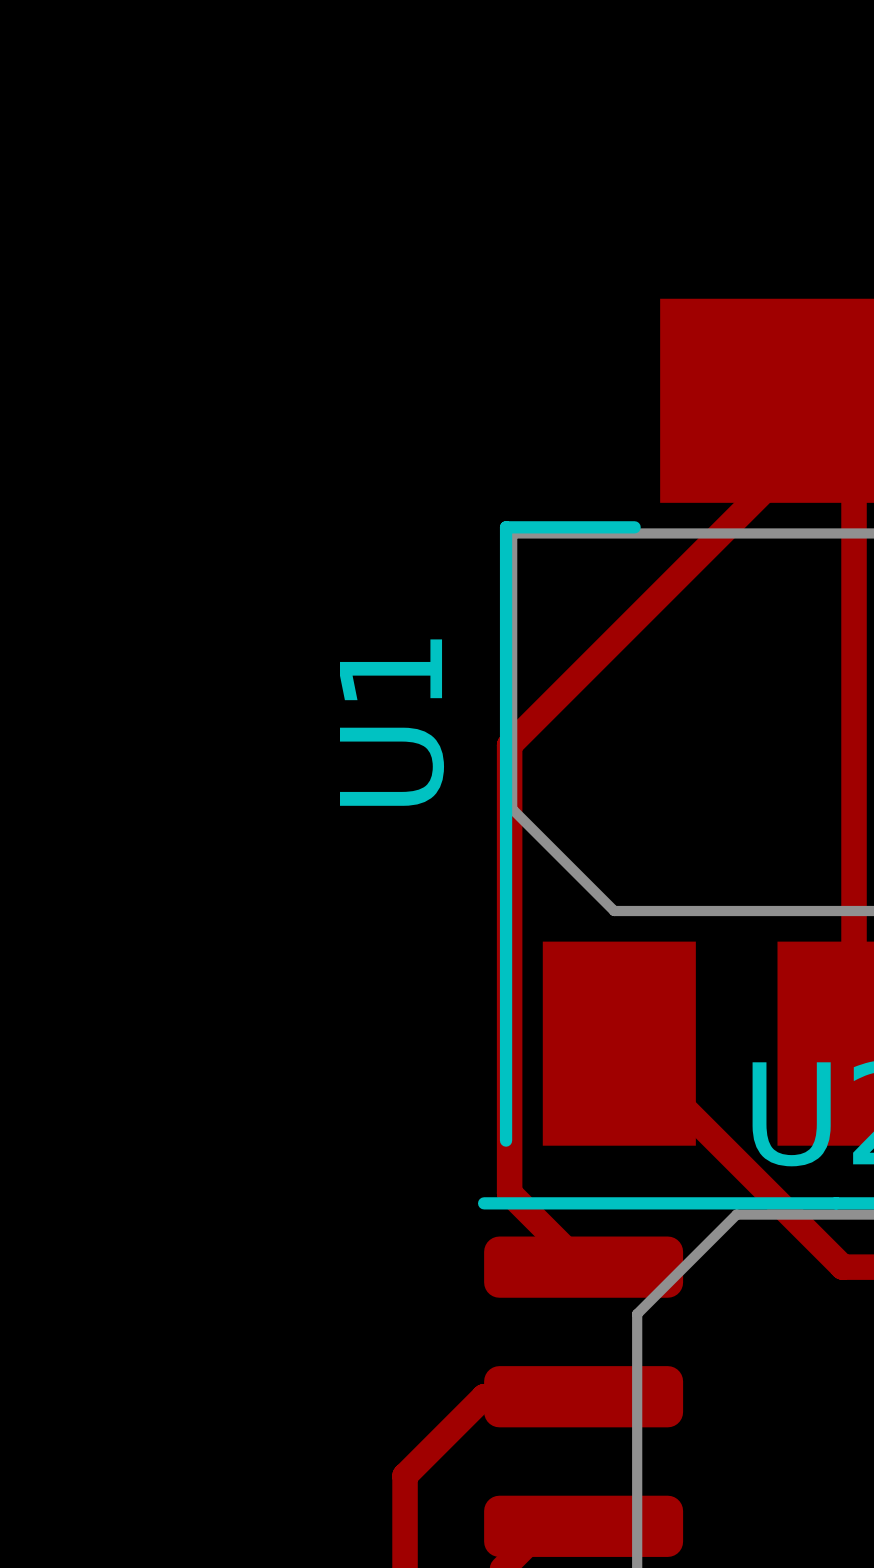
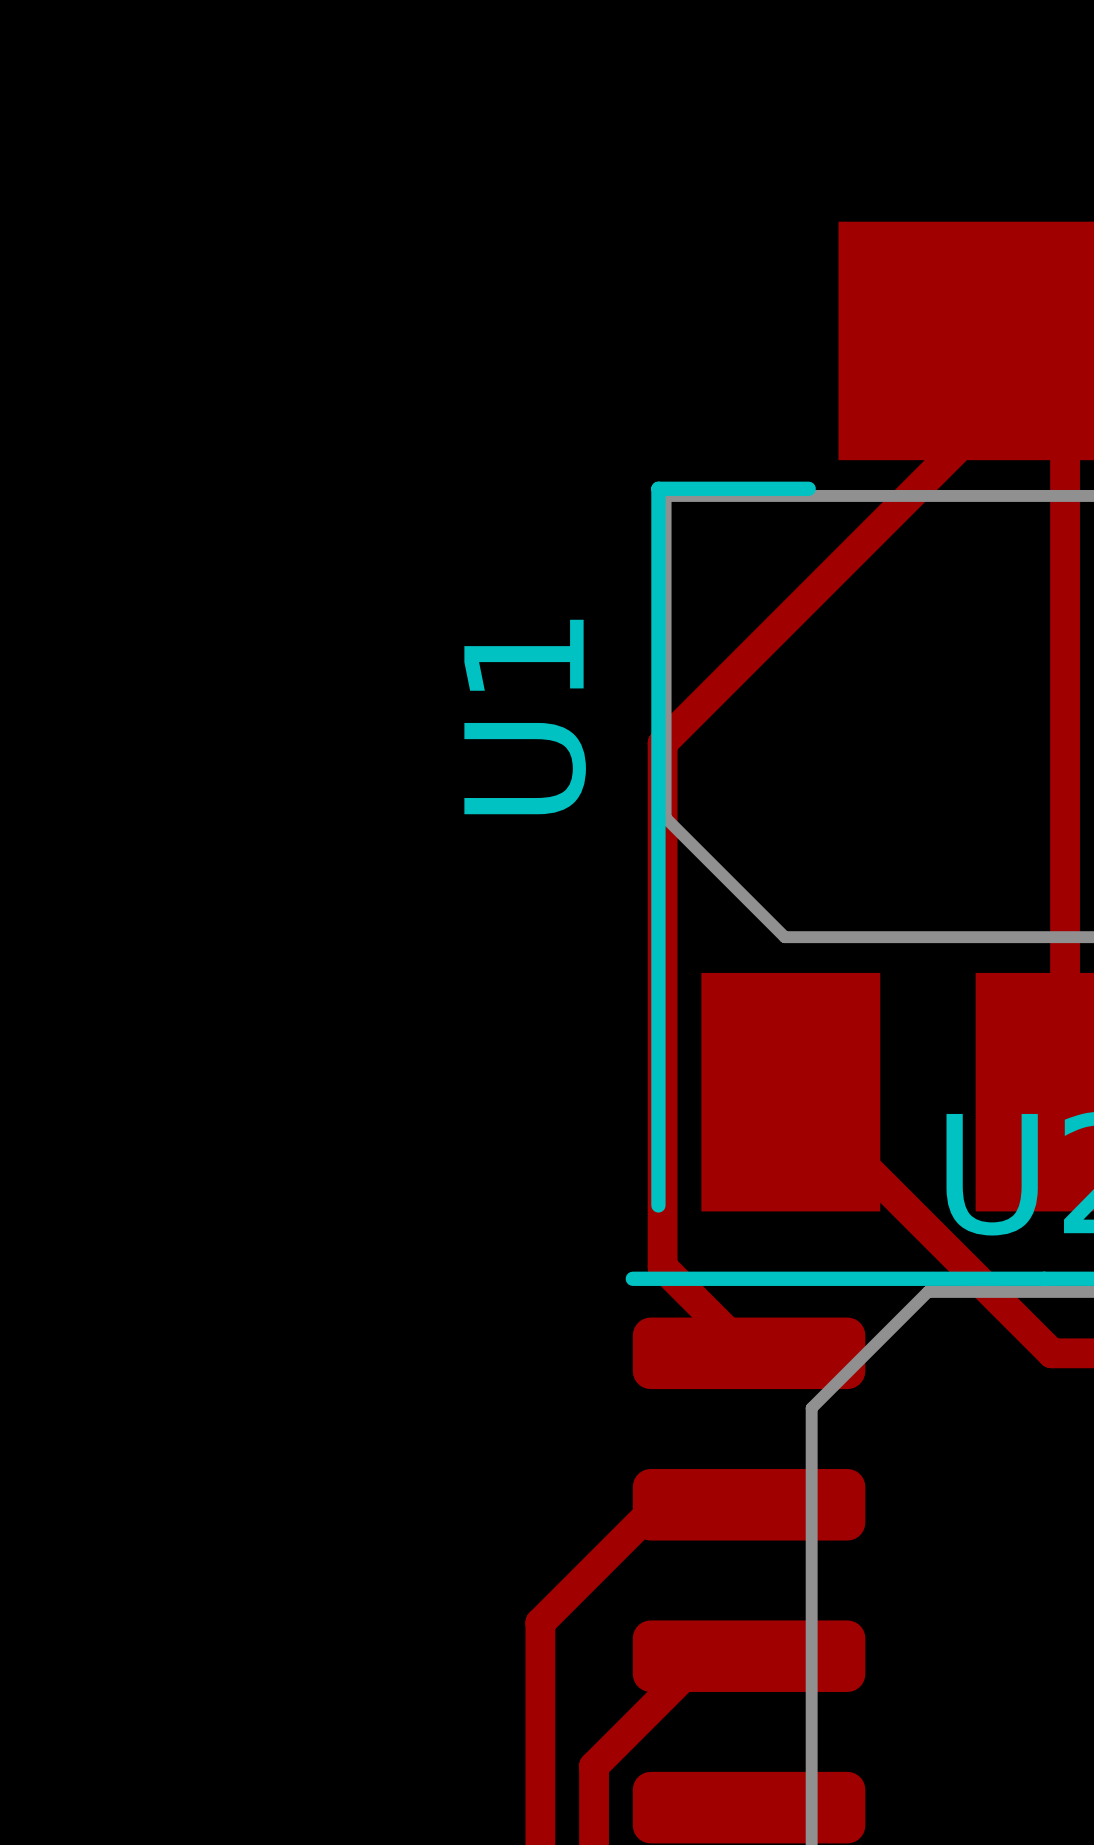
top track: (506, 1396) (484, 1396) (405, 1475) (405, 1497) -> (658, 1504) (540, 1622)

